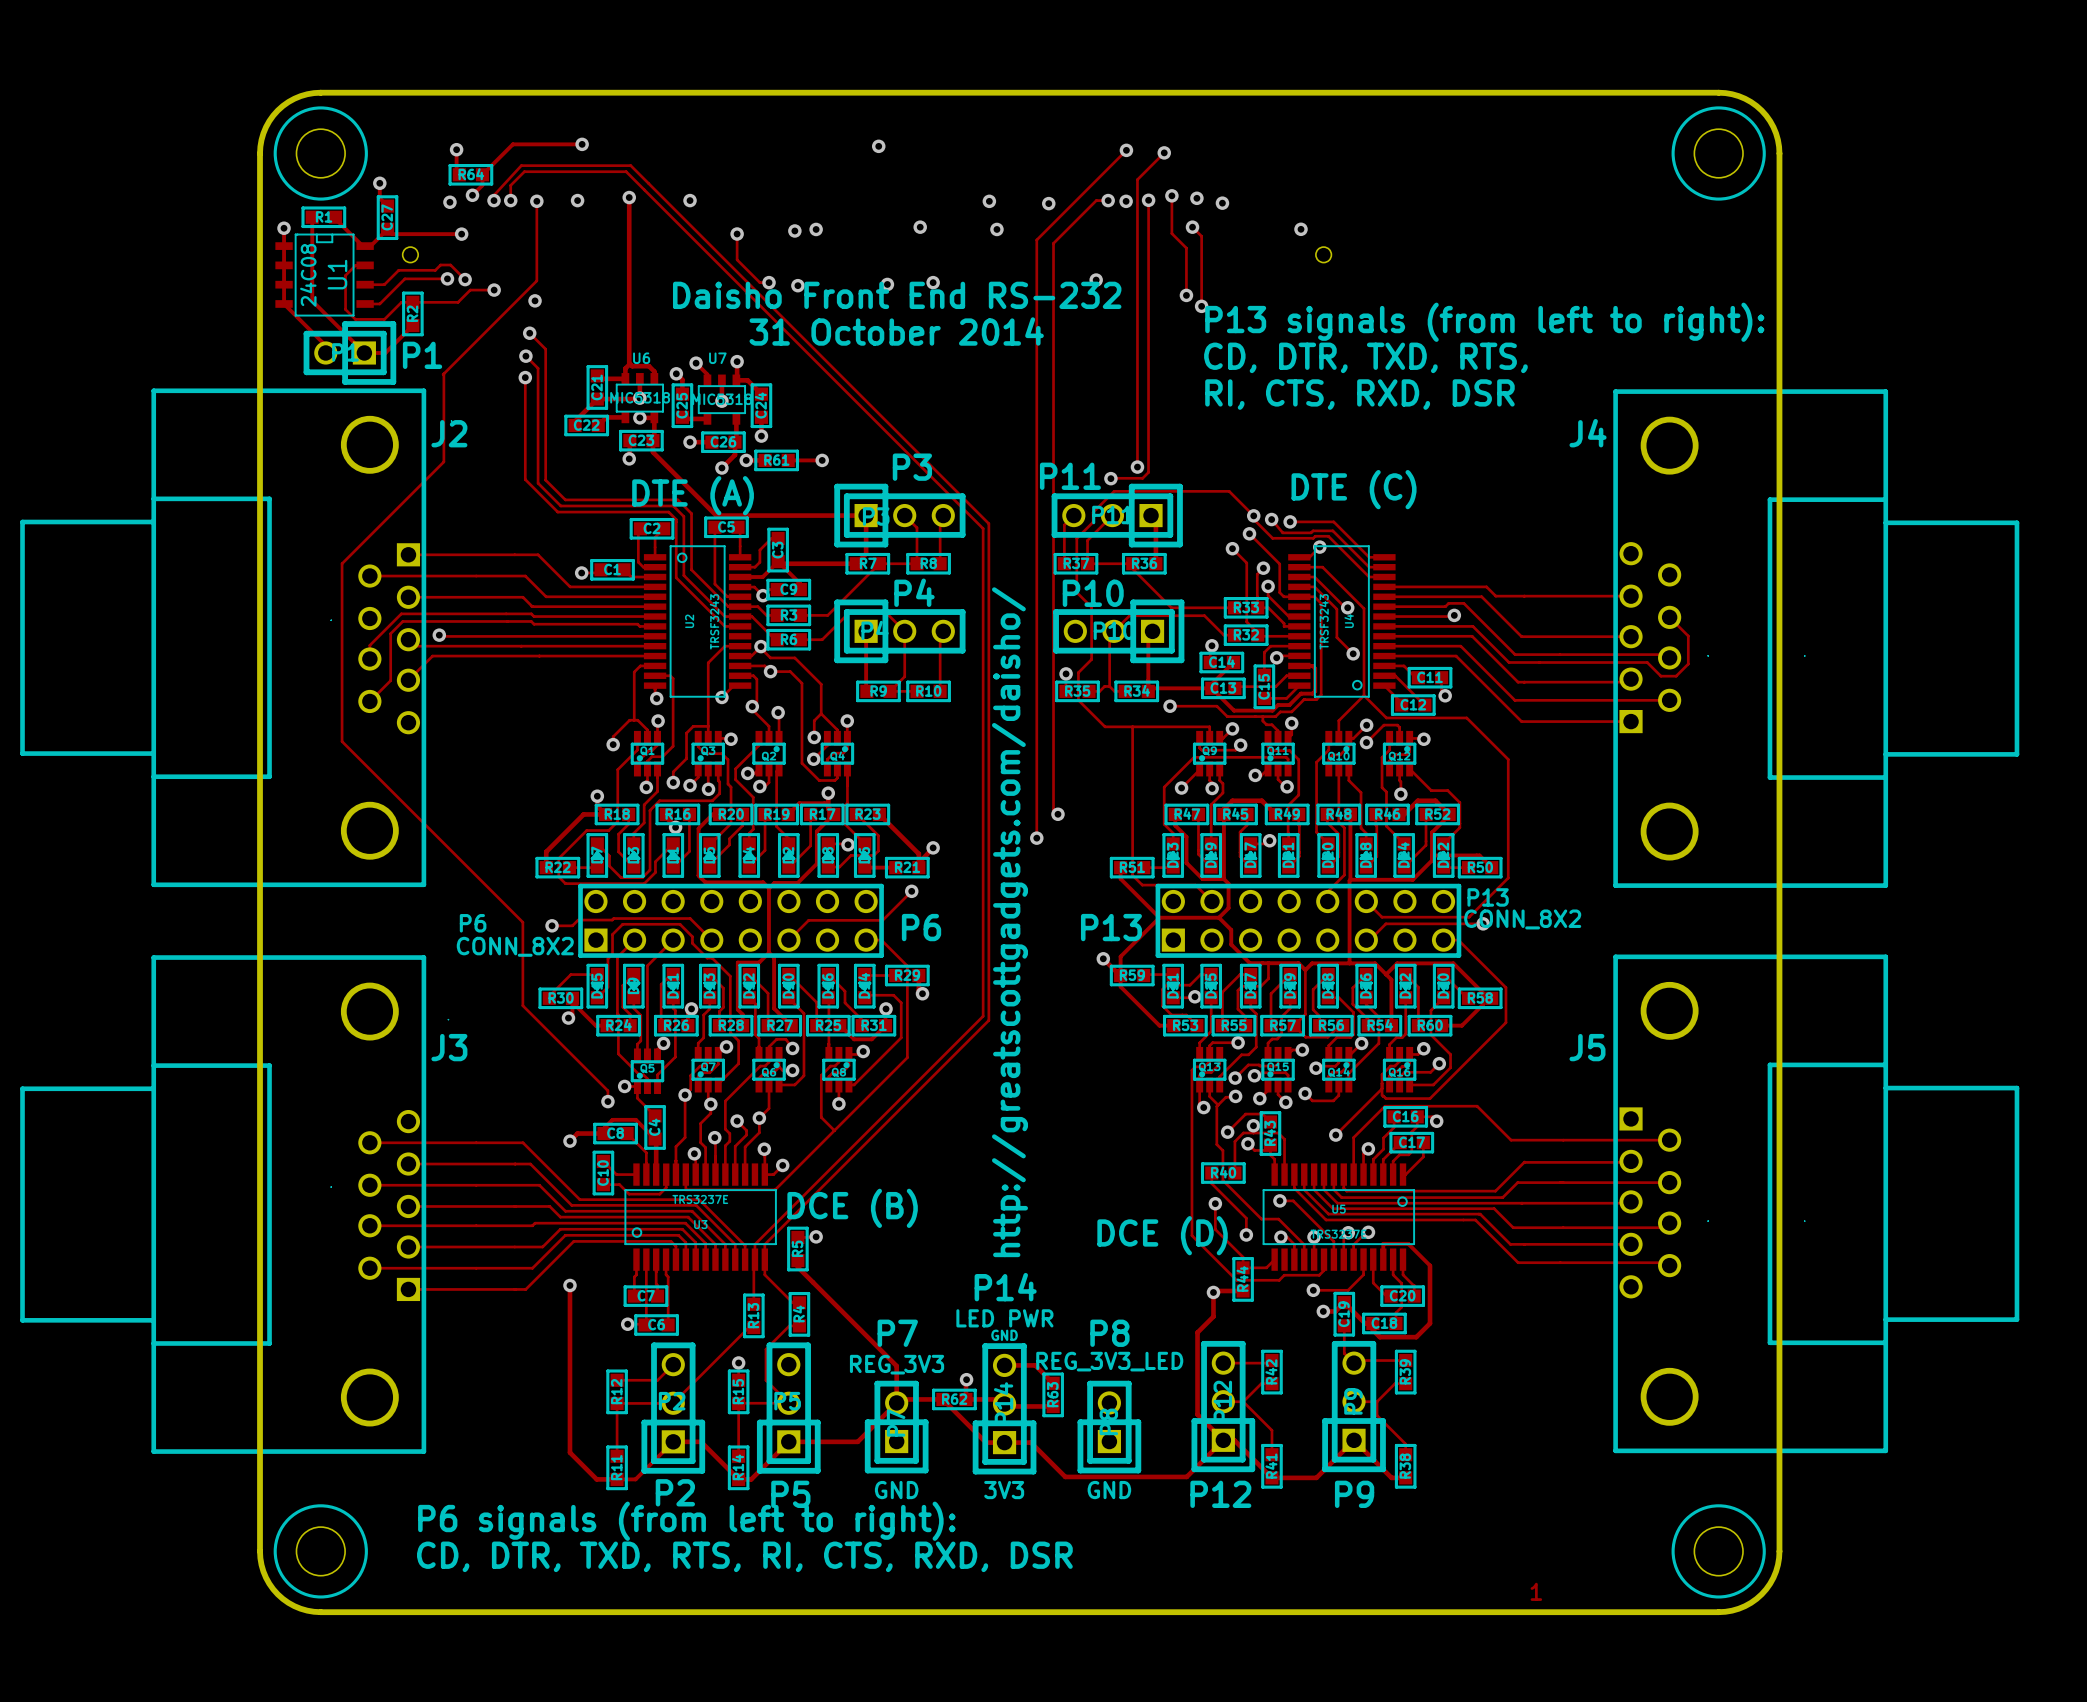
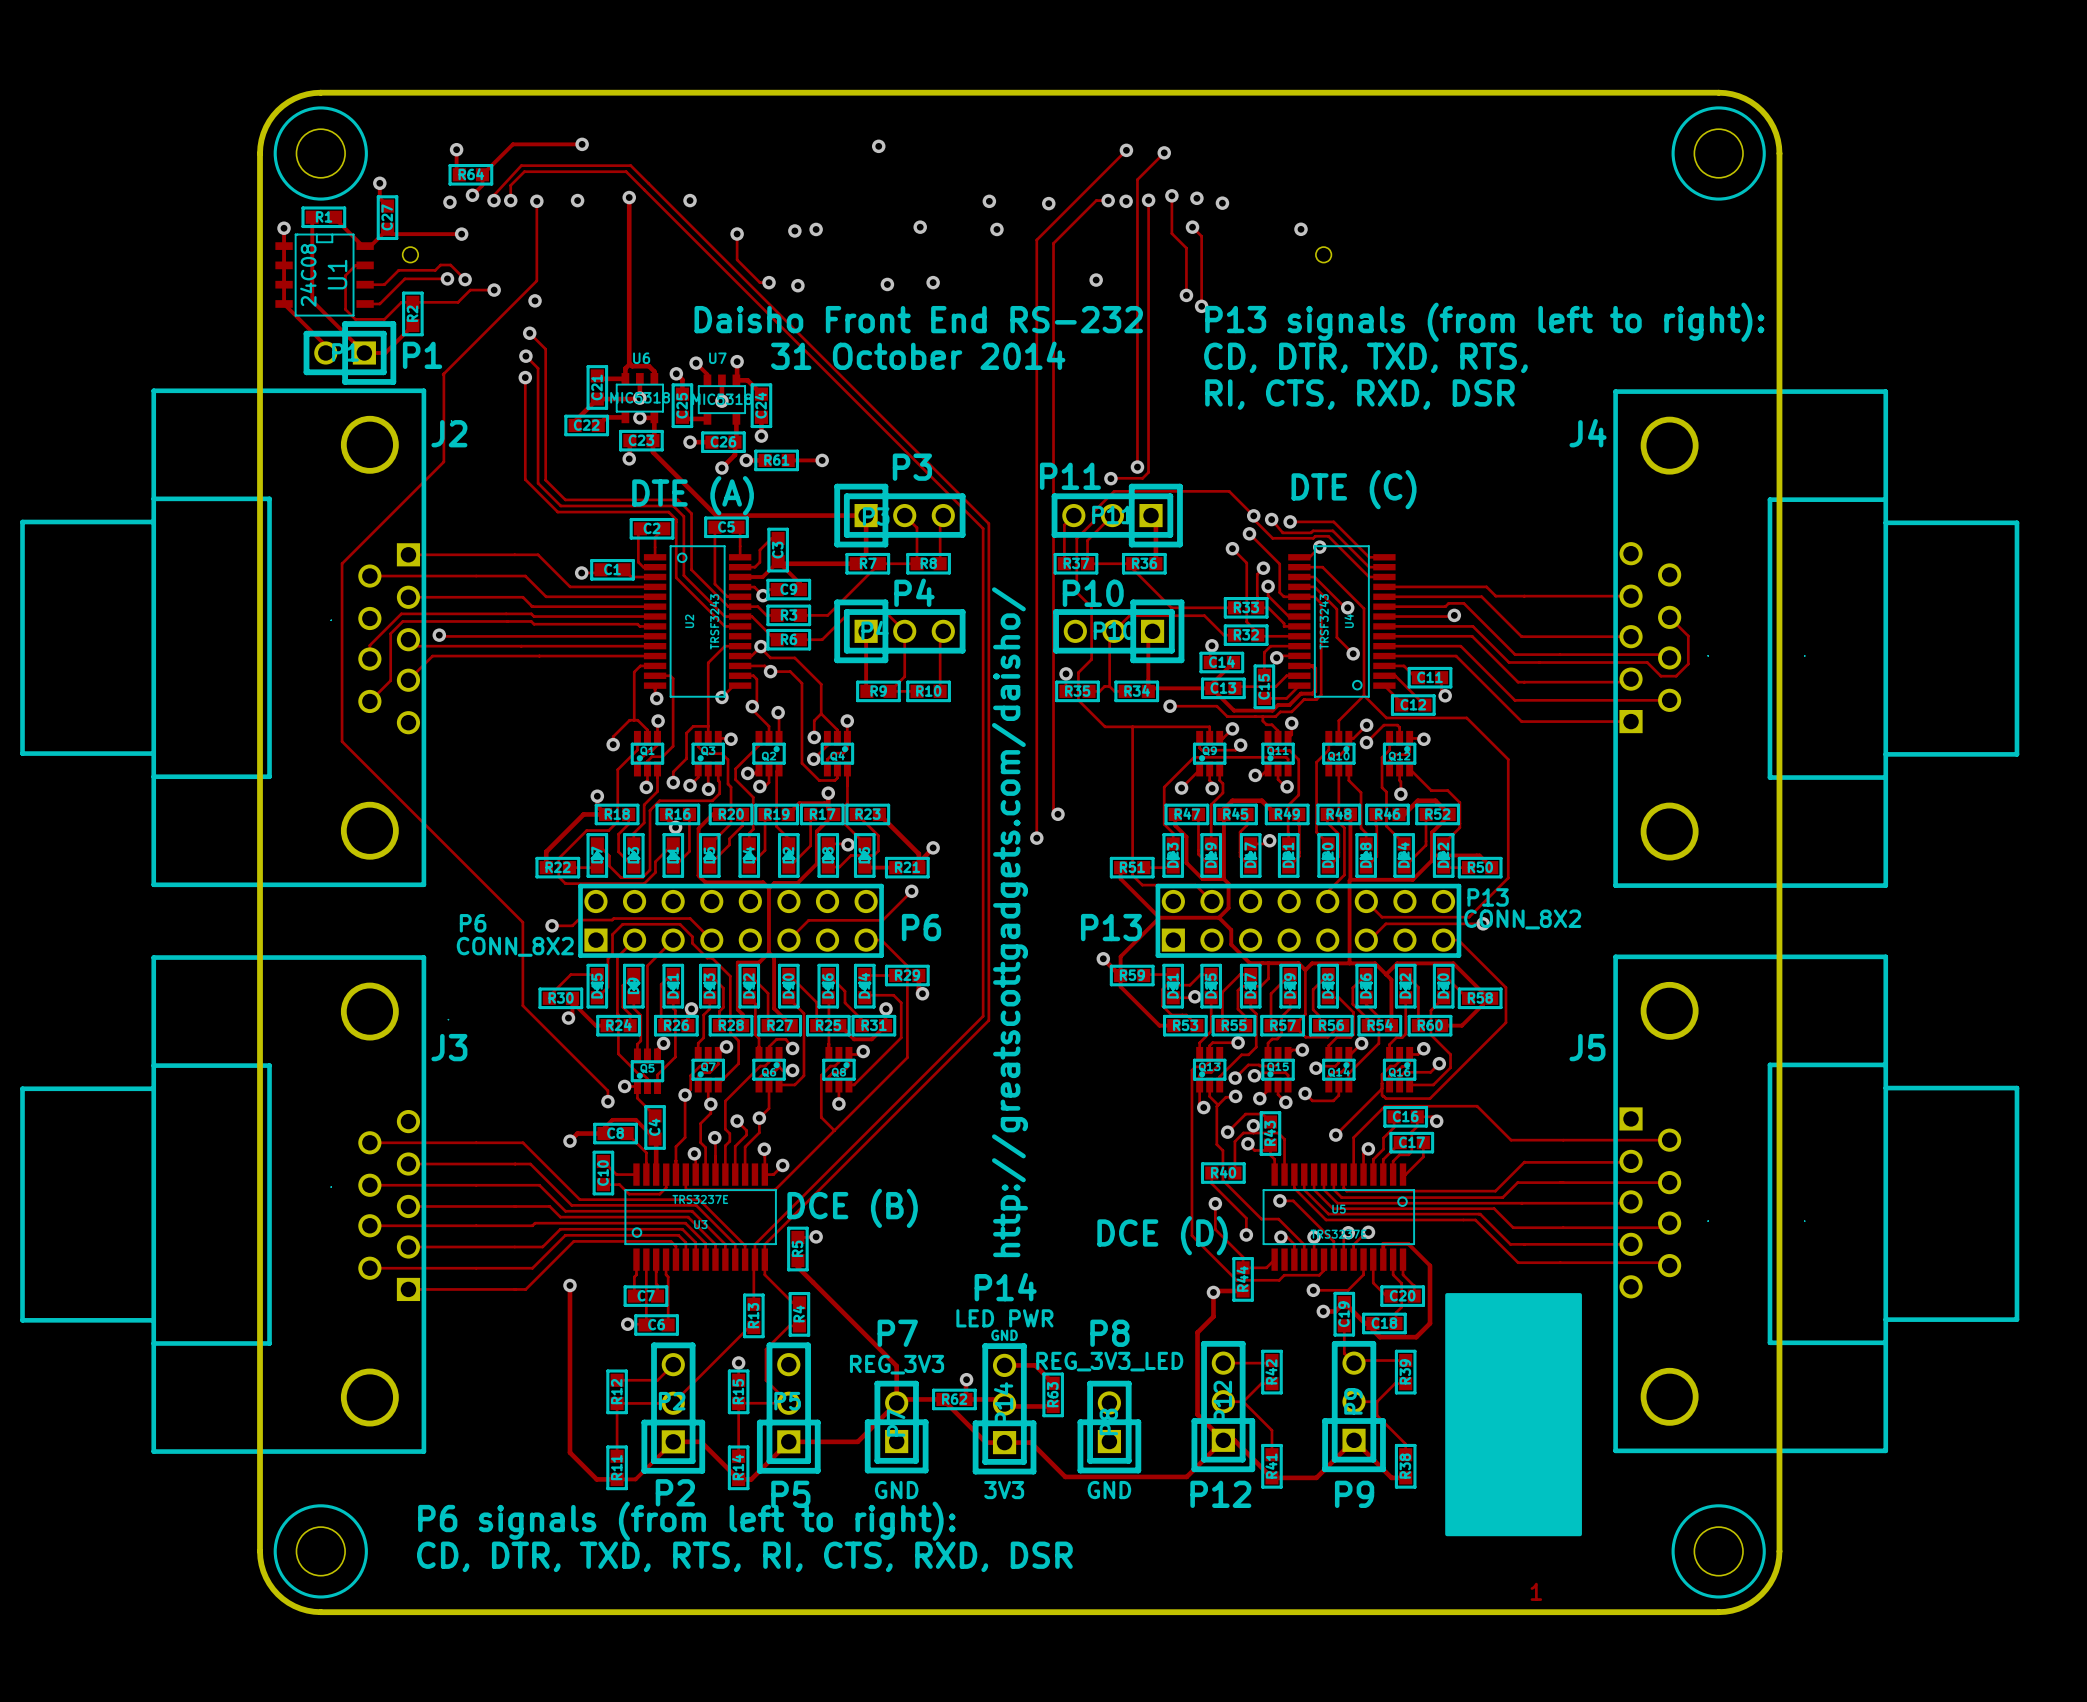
text position: Daisho Front End RS-232 (897, 295) -> Daisho Front End RS-232 (918, 319)
text position: 31 October 2014 (896, 331) -> 31 October 2014 (918, 355)
drawing: none -> [1445, 1293, 1582, 1537]

